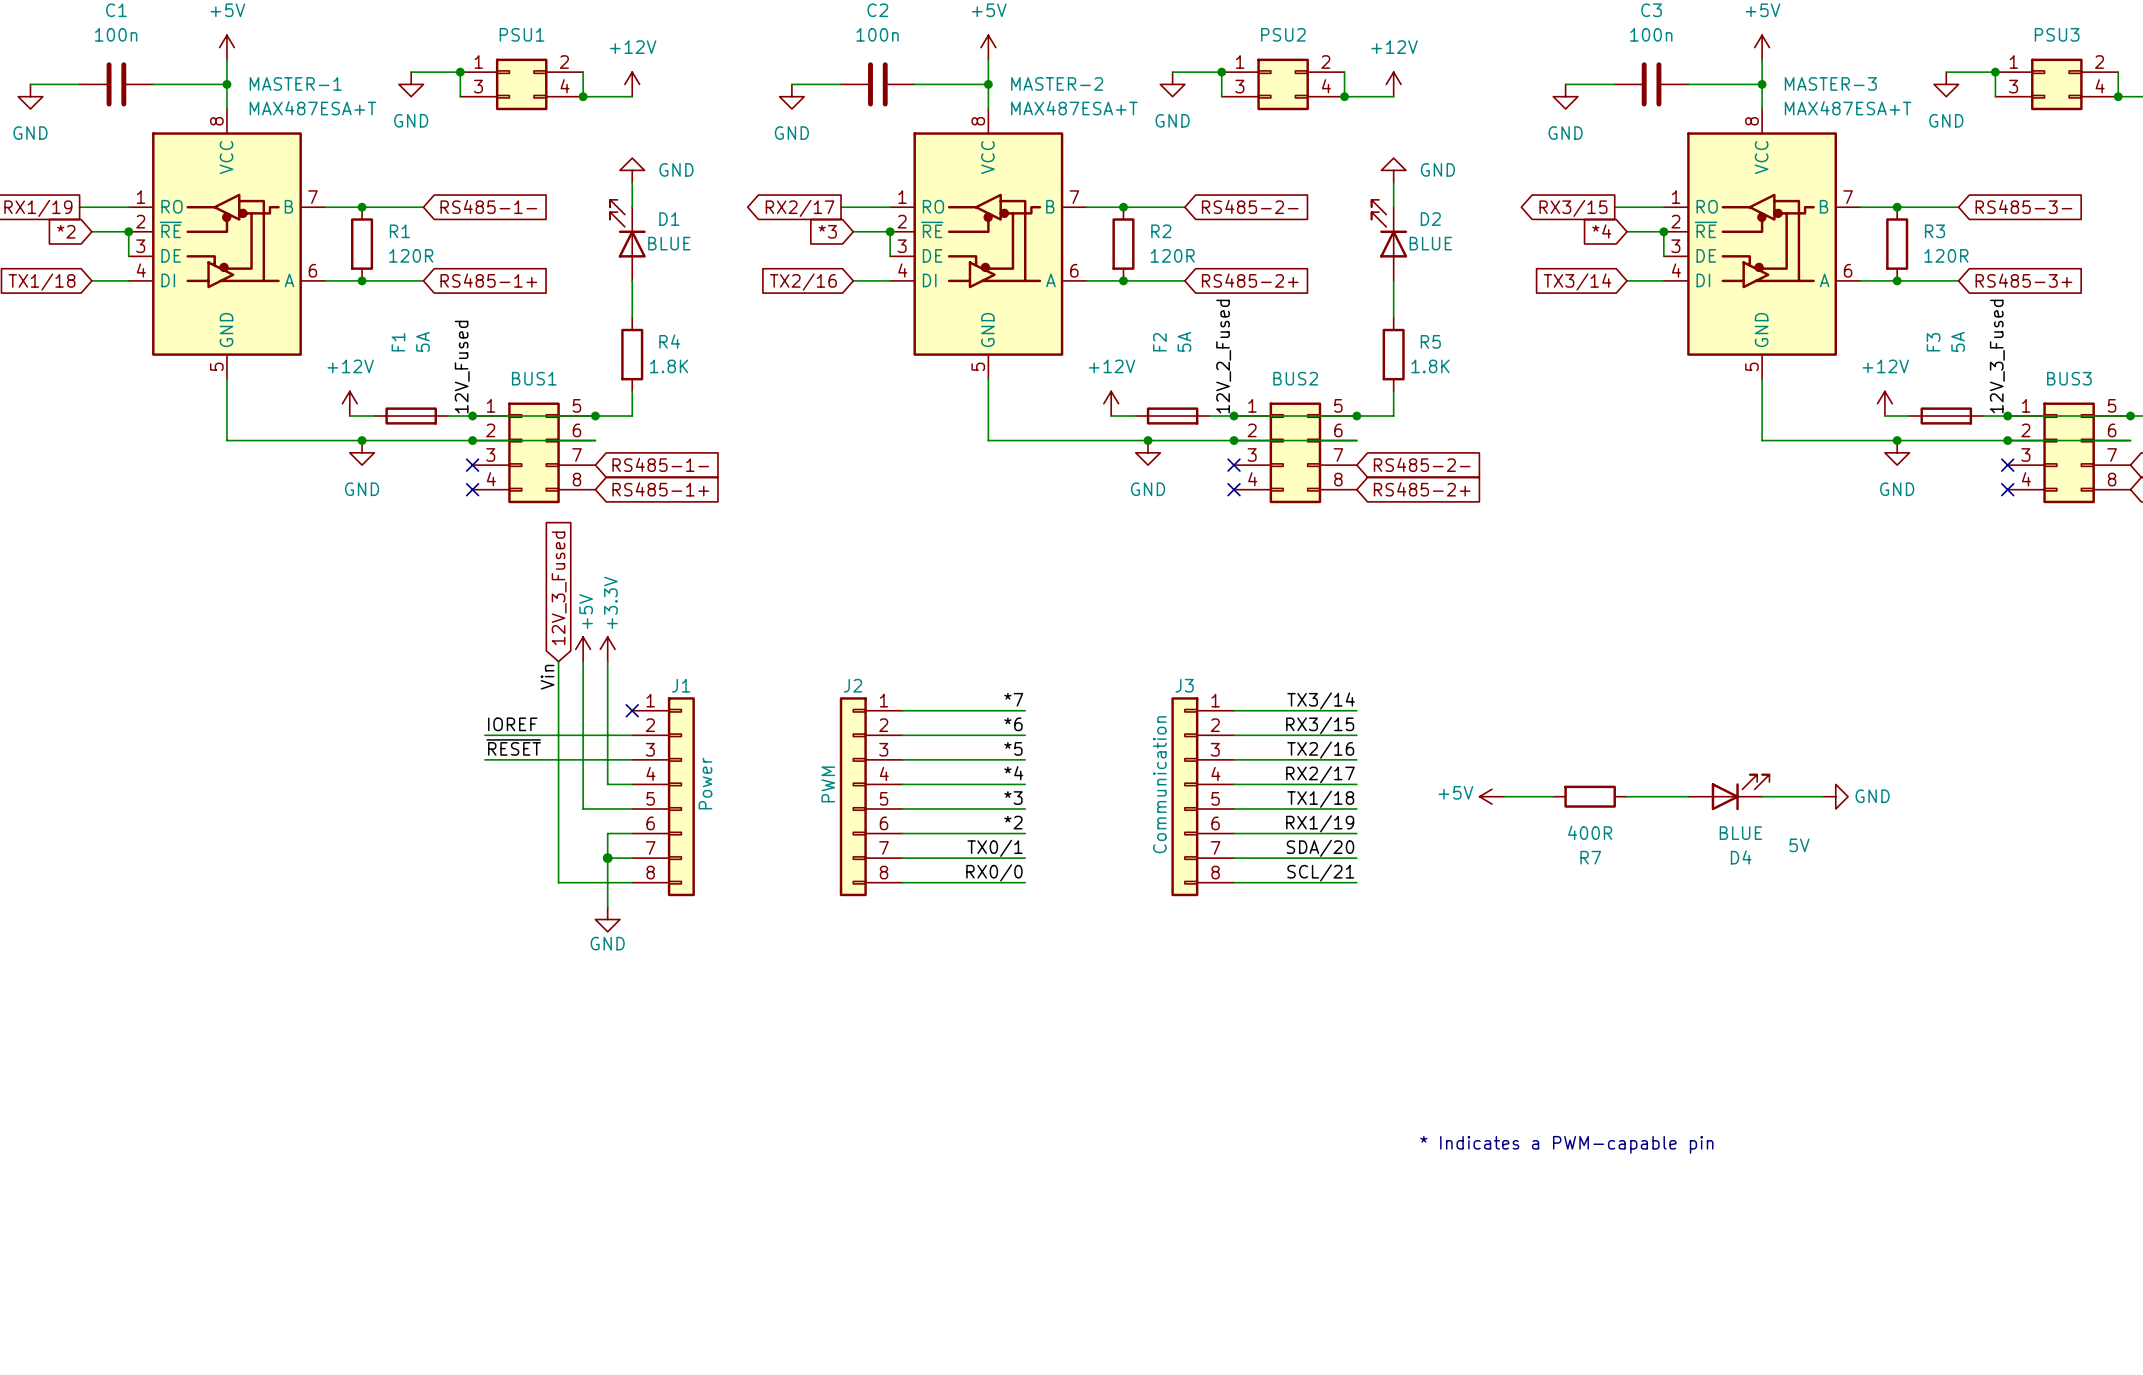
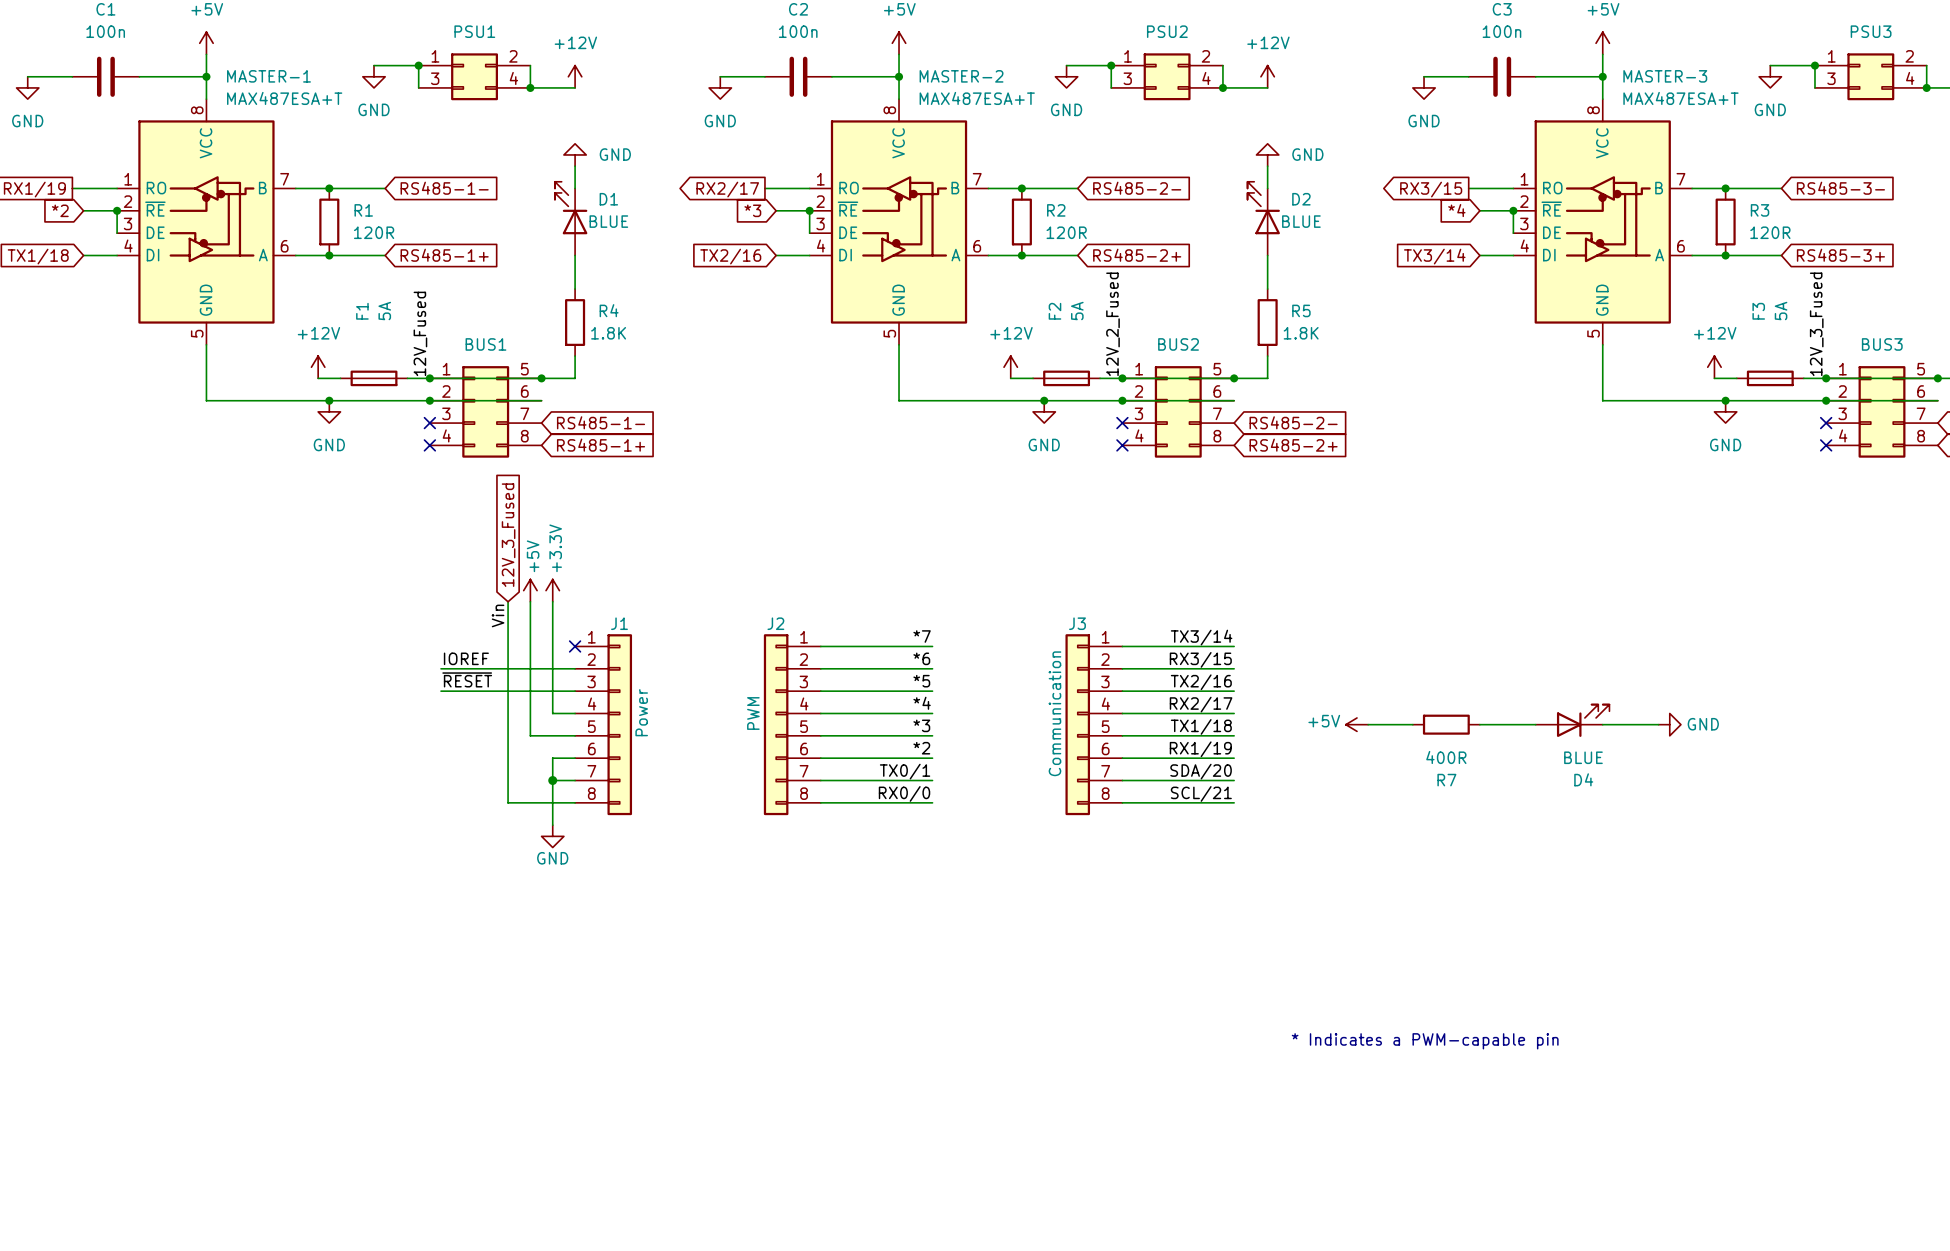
D4 text: 5V (1799, 845) -> none

